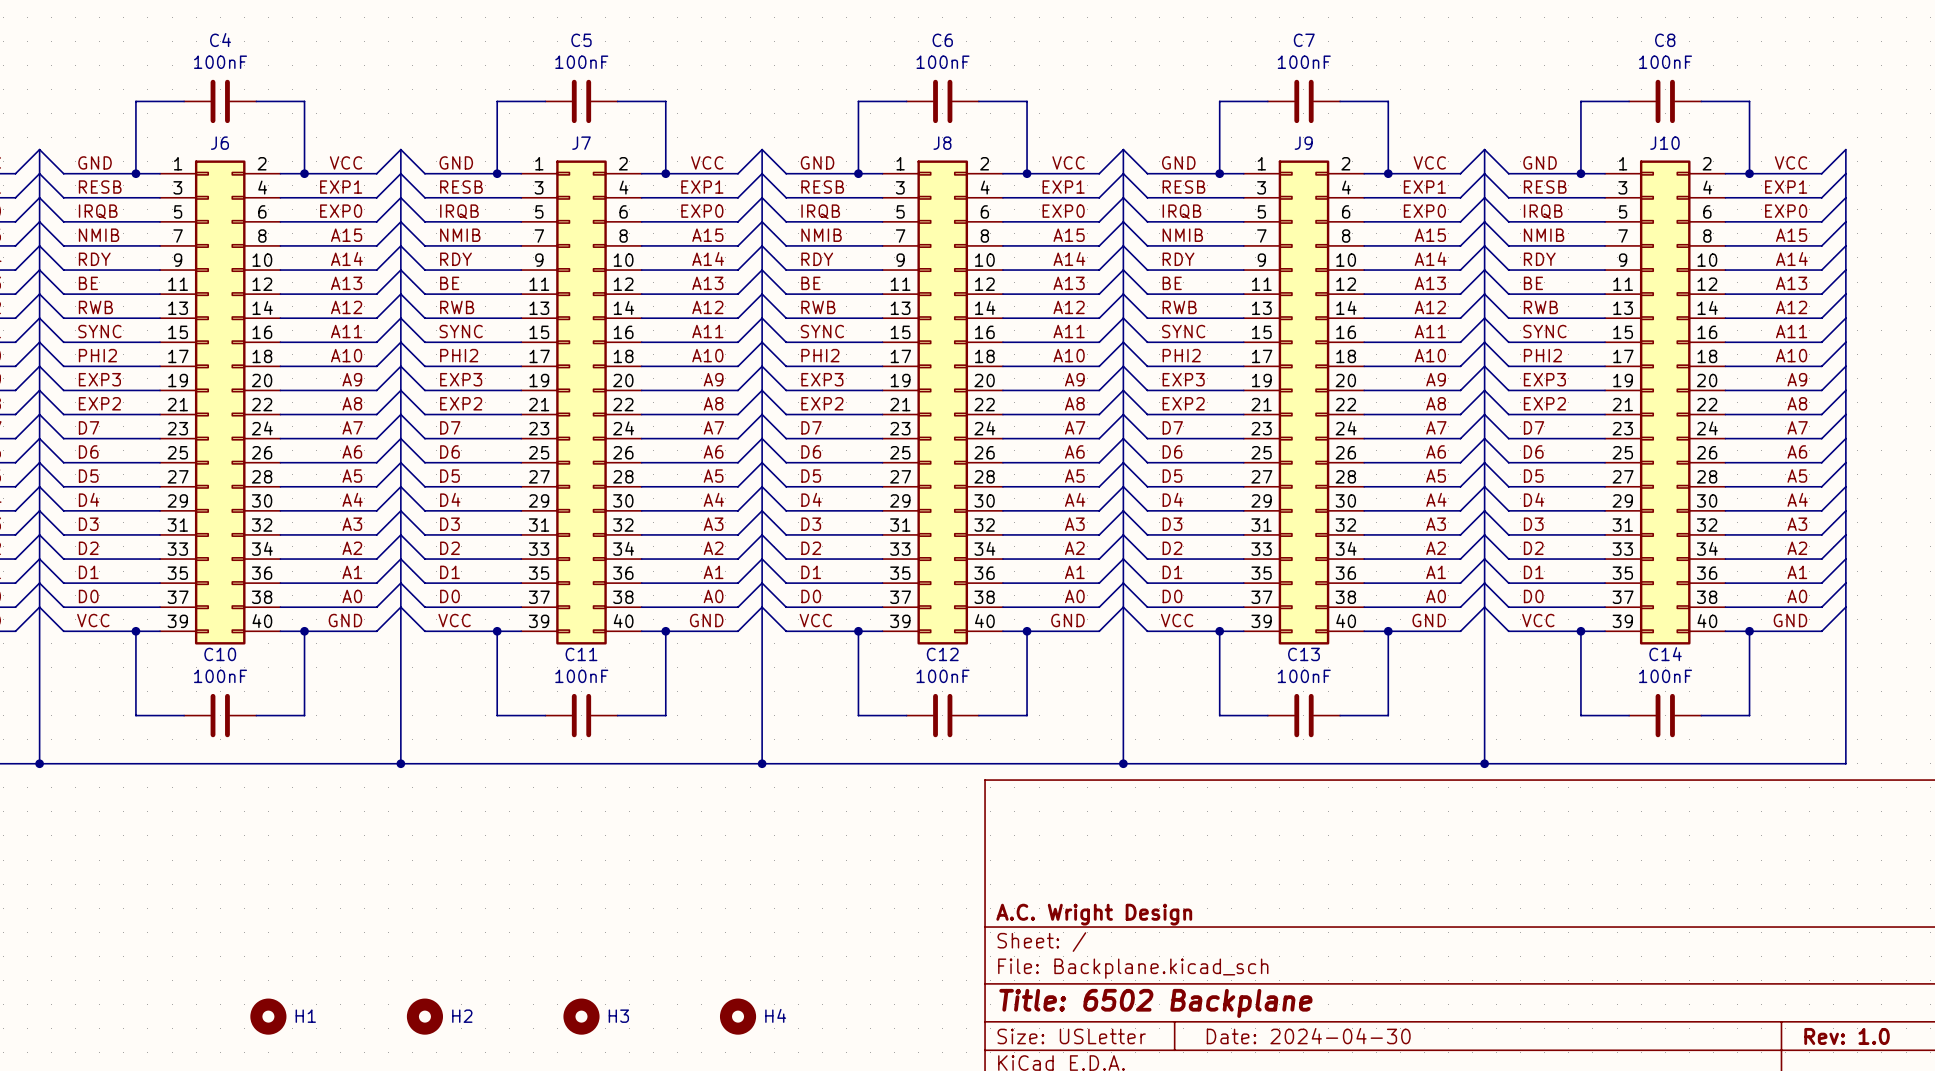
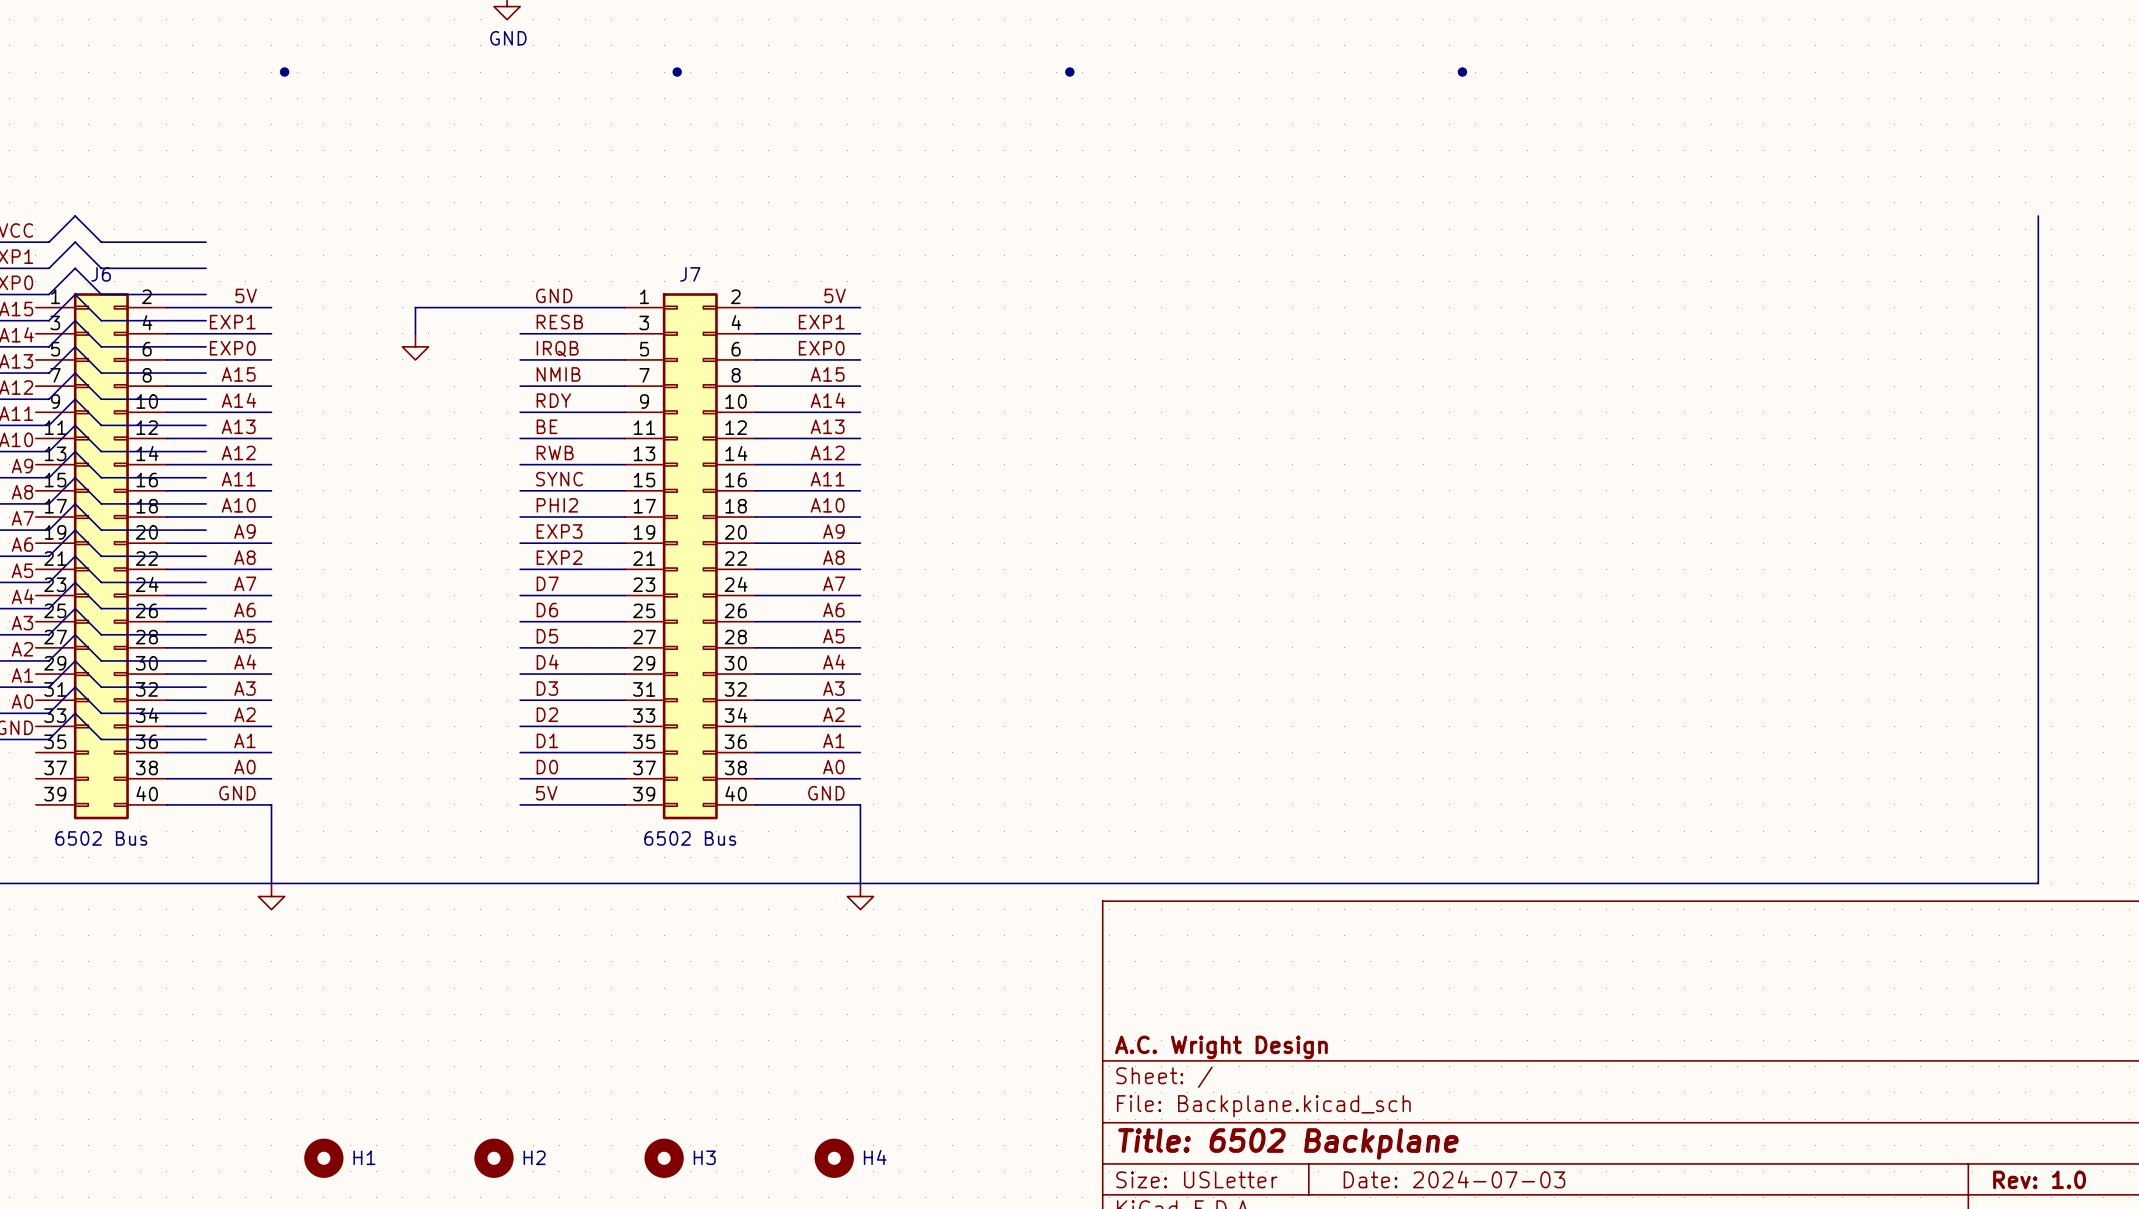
junction: none -> (284, 72)
junction: none -> (677, 72)
junction: none -> (1069, 72)
junction: none -> (1462, 72)
wire: (184, 101) (135, 101) (135, 173) -> none
C4: 100nF (220, 101) -> none
wire: (256, 101) (304, 101) (304, 173) -> none
wire: (545, 101) (497, 101) (497, 173) -> none
C5: 100nF (581, 101) -> none
wire: (617, 101) (665, 101) (665, 173) -> none
wire: (906, 101) (858, 101) (858, 173) -> none
C6: 100nF (942, 101) -> none
wire: (978, 101) (1027, 101) (1027, 173) -> none
wire: (1267, 101) (1219, 101) (1219, 173) -> none
C7: 100nF (1303, 101) -> none
wire: (1340, 101) (1388, 101) (1388, 173) -> none
wire: (1629, 101) (1580, 101) (1580, 173) -> none
C8: 100nF (1665, 101) -> none
wire: (1701, 101) (1749, 101) (1749, 173) -> none
bus: (39, 149) (39, 763) -> none
bus: (400, 149) (400, 763) -> none
bus: (762, 149) (762, 763) -> none
bus: (1123, 149) (1123, 763) -> none
bus: (1484, 149) (1484, 763) -> none
wire: (1845, 149) (1821, 173) (1725, 173) -> none
label: GND (95, 162) -> none
label: VCC (346, 162) -> none
label position: GND (456, 162) -> GND (554, 295)
label: VCC (707, 162) -> none
label: GND (817, 162) -> none
label: VCC (1068, 162) -> none
label: GND (1178, 162) -> none
label: VCC (1429, 162) -> none
label: GND (1540, 162) -> none
label: VCC (1791, 162) -> none
junction: (135, 173) -> none
wire: (280, 173) (376, 173) (400, 149) (424, 173) (521, 173) -> none
junction: (304, 173) -> none
junction: (497, 173) -> none
wire: (641, 173) (738, 173) (762, 149) (786, 173) (882, 173) -> none
junction: (665, 173) -> none
junction: (858, 173) -> none
wire: (1002, 173) (1099, 173) (1123, 149) (1147, 173) (1243, 173) -> none
junction: (1027, 173) -> none
junction: (1219, 173) -> none
wire: (1364, 173) (1460, 173) (1484, 149) (1508, 173) (1605, 173) -> none
junction: (1388, 173) -> none
junction: (1580, 173) -> none
junction: (1749, 173) -> none
wire: (1845, 173) (1821, 197) (1725, 197) -> none
label: RESB (100, 187) -> none
label position: EXP1 (341, 187) -> EXP1 (232, 322)
label position: RESB (461, 187) -> RESB (559, 322)
label position: EXP1 (702, 187) -> EXP1 (821, 322)
label: RESB (822, 187) -> none
label: EXP1 (1063, 187) -> none
label: RESB (1183, 187) -> none
label: EXP1 (1424, 187) -> none
label: RESB (1545, 187) -> none
label: EXP1 (1786, 187) -> none
wire: (280, 197) (376, 197) (400, 173) (424, 197) (521, 197) -> none
wire: (641, 197) (738, 197) (762, 173) (786, 197) (882, 197) -> none
wire: (1002, 197) (1099, 197) (1123, 173) (1147, 197) (1243, 197) -> none
wire: (1364, 197) (1460, 197) (1484, 173) (1508, 197) (1605, 197) -> none
wire: (1845, 197) (1821, 221) (1725, 221) -> none
label: IRQB (98, 211) -> none
label position: EXP0 (341, 211) -> EXP0 (232, 348)
label position: IRQB (459, 211) -> IRQB (557, 348)
label position: EXP0 (702, 211) -> EXP0 (821, 348)
label: IRQB (820, 211) -> none
label: EXP0 (1063, 211) -> none
label: IRQB (1181, 211) -> none
label: EXP0 (1424, 211) -> none
label: IRQB (1543, 211) -> none
label: EXP0 (1786, 211) -> none
wire: (280, 221) (376, 221) (400, 197) (424, 221) (521, 221) -> none
wire: (641, 221) (738, 221) (762, 197) (786, 221) (882, 221) -> none
wire: (1002, 221) (1099, 221) (1123, 197) (1147, 221) (1243, 221) -> none
wire: (1364, 221) (1460, 221) (1484, 197) (1508, 221) (1605, 221) -> none
wire: (1845, 221) (1821, 245) (1725, 245) -> none
label: none -> 5V (246, 295)
label: none -> 5V (835, 295)
wire: none -> (166, 307) (271, 307)
wire: none -> (624, 307) (415, 307) (415, 333)
wire: none -> (755, 307) (860, 307)
label: NMIB (99, 235) -> none
label position: A15 (346, 235) -> A15 (238, 374)
label position: NMIB (460, 235) -> NMIB (558, 374)
label position: A15 (707, 235) -> A15 (827, 374)
label: NMIB (821, 235) -> none
label: A15 (1069, 235) -> none
label: NMIB (1182, 235) -> none
label: A15 (1430, 235) -> none
label: NMIB (1544, 235) -> none
label: A15 (1791, 235) -> none
wire: (280, 245) (376, 245) (400, 221) (424, 245) (521, 245) -> none
wire: (641, 245) (738, 245) (762, 221) (786, 245) (882, 245) -> none
wire: (1002, 245) (1099, 245) (1123, 221) (1147, 245) (1243, 245) -> none
wire: (1364, 245) (1460, 245) (1484, 221) (1508, 245) (1605, 245) -> none
wire: (1845, 245) (1821, 270) (1725, 270) -> none
wire: none -> (166, 333) (271, 333)
wire: none -> (520, 333) (624, 333)
wire: none -> (755, 333) (860, 333)
label: RDY (94, 259) -> none
label position: A14 (346, 259) -> A14 (239, 400)
label position: RDY (456, 259) -> RDY (553, 400)
label position: A14 (708, 259) -> A14 (827, 400)
label: RDY (817, 259) -> none
label: A14 (1069, 259) -> none
label: RDY (1178, 259) -> none
label: A14 (1430, 259) -> none
label: RDY (1539, 259) -> none
label: A14 (1791, 259) -> none
wire: (280, 270) (376, 270) (400, 245) (424, 270) (521, 270) -> none
power symbol: none -> (415, 346)
wire: (641, 270) (738, 270) (762, 245) (786, 270) (882, 270) -> none
wire: (1002, 270) (1099, 270) (1123, 245) (1147, 270) (1243, 270) -> none
wire: (1364, 270) (1460, 270) (1484, 245) (1508, 270) (1605, 270) -> none
wire: (1845, 270) (1821, 294) (1725, 294) -> none
wire: none -> (166, 359) (271, 359)
wire: none -> (520, 359) (624, 359)
wire: none -> (755, 359) (860, 359)
label: BE (88, 283) -> none
label position: A13 (346, 283) -> A13 (238, 426)
label position: BE (449, 283) -> BE (547, 426)
label position: A13 (707, 283) -> A13 (827, 426)
label: BE (810, 283) -> none
label: A13 (1069, 283) -> none
label: BE (1172, 283) -> none
label: A13 (1430, 283) -> none
label: BE (1533, 283) -> none
label: A13 (1791, 283) -> none
wire: (280, 294) (376, 294) (400, 270) (424, 294) (521, 294) -> none
wire: (641, 294) (738, 294) (762, 270) (786, 294) (882, 294) -> none
wire: (1002, 294) (1099, 294) (1123, 270) (1147, 294) (1243, 294) -> none
wire: (1364, 294) (1460, 294) (1484, 270) (1508, 294) (1605, 294) -> none
wire: (1845, 294) (1821, 318) (1725, 318) -> none
wire: none -> (166, 386) (271, 386)
wire: none -> (520, 386) (624, 386)
wire: none -> (755, 386) (860, 386)
label: RWB (95, 307) -> none
label position: A12 (346, 307) -> A12 (238, 452)
label position: RWB (457, 307) -> RWB (555, 452)
label position: A12 (707, 307) -> A12 (827, 452)
label: RWB (818, 307) -> none
label: A12 (1069, 307) -> none
label: RWB (1179, 307) -> none
label: A12 (1430, 307) -> none
label: RWB (1540, 307) -> none
label: A12 (1791, 307) -> none
wire: (280, 318) (376, 318) (400, 294) (424, 318) (521, 318) -> none
wire: (641, 318) (738, 318) (762, 294) (786, 318) (882, 318) -> none
wire: (1002, 318) (1099, 318) (1123, 294) (1147, 318) (1243, 318) -> none
wire: (1364, 318) (1460, 318) (1484, 294) (1508, 318) (1605, 318) -> none
wire: (1845, 318) (1821, 342) (1725, 342) -> none
wire: none -> (166, 412) (271, 412)
wire: none -> (520, 412) (624, 412)
wire: none -> (755, 412) (860, 412)
label: SYNC (99, 331) -> none
label position: A11 (346, 331) -> A11 (238, 479)
label position: SYNC (461, 331) -> SYNC (559, 479)
label position: A11 (707, 331) -> A11 (827, 479)
label: SYNC (822, 331) -> none
label: A11 (1069, 331) -> none
label: SYNC (1183, 331) -> none
label: A11 (1430, 331) -> none
label: SYNC (1544, 331) -> none
label: A11 (1791, 331) -> none
wire: (280, 342) (376, 342) (400, 318) (424, 342) (521, 342) -> none
wire: (641, 342) (738, 342) (762, 318) (786, 342) (882, 342) -> none
wire: (1002, 342) (1099, 342) (1123, 318) (1147, 342) (1243, 342) -> none
wire: (1364, 342) (1460, 342) (1484, 318) (1508, 342) (1605, 342) -> none
wire: (1845, 342) (1821, 366) (1725, 366) -> none
wire: none -> (166, 438) (271, 438)
wire: none -> (520, 438) (624, 438)
wire: none -> (755, 438) (860, 438)
label: PHI2 (97, 355) -> none
label position: A10 (346, 355) -> A10 (238, 505)
label position: PHI2 (459, 355) -> PHI2 (557, 505)
label position: A10 (707, 355) -> A10 (827, 505)
label: PHI2 (820, 355) -> none
label: A10 (1069, 355) -> none
label: PHI2 (1181, 355) -> none
label: A10 (1430, 355) -> none
label: PHI2 (1542, 355) -> none
label: A10 (1791, 355) -> none
wire: (280, 366) (376, 366) (400, 342) (424, 366) (521, 366) -> none
wire: (641, 366) (738, 366) (762, 342) (786, 366) (882, 366) -> none
wire: (1002, 366) (1099, 366) (1123, 342) (1147, 366) (1243, 366) -> none
wire: (1364, 366) (1460, 366) (1484, 342) (1508, 366) (1605, 366) -> none
wire: (1845, 366) (1821, 390) (1725, 390) -> none
wire: none -> (166, 464) (271, 464)
wire: none -> (520, 464) (624, 464)
wire: none -> (755, 464) (860, 464)
label: EXP3 (99, 379) -> none
label position: A9 (352, 379) -> A9 (244, 531)
label position: EXP3 (461, 379) -> EXP3 (559, 531)
label position: A9 (713, 379) -> A9 (833, 531)
label: EXP3 (822, 379) -> none
label: A9 (1074, 379) -> none
label: EXP3 (1183, 379) -> none
label: A9 (1436, 379) -> none
label: EXP3 (1544, 379) -> none
label: A9 (1797, 379) -> none
wire: (280, 390) (376, 390) (400, 366) (424, 390) (521, 390) -> none
wire: (641, 390) (738, 390) (762, 366) (786, 390) (882, 390) -> none
wire: (1002, 390) (1099, 390) (1123, 366) (1147, 390) (1243, 390) -> none
wire: (1364, 390) (1460, 390) (1484, 366) (1508, 390) (1605, 390) -> none
wire: (1845, 390) (1821, 414) (1725, 414) -> none
wire: none -> (166, 490) (271, 490)
J6 position: (220, 402) -> (101, 556)
wire: none -> (520, 490) (624, 490)
J7 position: (581, 402) -> (690, 556)
wire: none -> (755, 490) (860, 490)
J8: (942, 402) -> none
J9: (1303, 402) -> none
J10: (1665, 402) -> none
label: EXP2 (99, 403) -> none
label position: A8 (352, 403) -> A8 (244, 557)
label position: EXP2 (461, 403) -> EXP2 (559, 557)
label position: A8 (713, 403) -> A8 (833, 557)
label: EXP2 (822, 403) -> none
label: A8 (1074, 403) -> none
label: EXP2 (1183, 403) -> none
label: A8 (1436, 403) -> none
label: EXP2 (1544, 403) -> none
label: A8 (1797, 403) -> none
wire: (280, 414) (376, 414) (400, 390) (424, 414) (521, 414) -> none
wire: (641, 414) (738, 414) (762, 390) (786, 414) (882, 414) -> none
wire: (1002, 414) (1099, 414) (1123, 390) (1147, 414) (1243, 414) -> none
wire: (1364, 414) (1460, 414) (1484, 390) (1508, 414) (1605, 414) -> none
wire: (1845, 414) (1821, 438) (1725, 438) -> none
wire: none -> (166, 517) (271, 517)
wire: none -> (520, 517) (624, 517)
wire: none -> (755, 517) (860, 517)
label: D7 (89, 427) -> none
label position: A7 (352, 427) -> A7 (245, 583)
label position: D7 (450, 427) -> D7 (547, 583)
label position: A7 (713, 427) -> A7 (834, 583)
label: D7 (811, 427) -> none
label: A7 (1075, 427) -> none
label: D7 (1172, 427) -> none
label: A7 (1436, 427) -> none
label: D7 (1534, 427) -> none
label: A7 (1797, 427) -> none
wire: (280, 438) (376, 438) (400, 414) (424, 438) (521, 438) -> none
wire: (641, 438) (738, 438) (762, 414) (786, 438) (882, 438) -> none
wire: (1002, 438) (1099, 438) (1123, 414) (1147, 438) (1243, 438) -> none
wire: (1364, 438) (1460, 438) (1484, 414) (1508, 438) (1605, 438) -> none
wire: (1845, 438) (1821, 462) (1725, 462) -> none
wire: none -> (166, 543) (271, 543)
wire: none -> (520, 543) (624, 543)
wire: none -> (755, 543) (860, 543)
label: D6 (88, 451) -> none
label position: A6 (352, 451) -> A6 (244, 610)
label position: D6 (449, 451) -> D6 (547, 610)
label position: A6 (713, 451) -> A6 (833, 610)
label: D6 (811, 451) -> none
label: A6 (1074, 451) -> none
label: D6 (1172, 451) -> none
label: A6 (1436, 451) -> none
label: D6 (1533, 451) -> none
label: A6 (1797, 451) -> none
wire: (280, 462) (376, 462) (400, 438) (424, 462) (521, 462) -> none
wire: (641, 462) (738, 462) (762, 438) (786, 462) (882, 462) -> none
wire: (1002, 462) (1099, 462) (1123, 438) (1147, 462) (1243, 462) -> none
wire: (1364, 462) (1460, 462) (1484, 438) (1508, 462) (1605, 462) -> none
wire: (1845, 462) (1821, 486) (1725, 486) -> none
wire: none -> (166, 569) (271, 569)
wire: none -> (520, 569) (624, 569)
wire: none -> (755, 569) (860, 569)
label: D5 (88, 476) -> none
label position: A5 (352, 476) -> A5 (244, 636)
label position: D5 (449, 476) -> D5 (547, 636)
label position: A5 (713, 476) -> A5 (833, 636)
label: D5 (811, 476) -> none
label: A5 (1074, 476) -> none
label: D5 (1172, 476) -> none
label: A5 (1436, 476) -> none
label: D5 (1533, 476) -> none
label: A5 (1797, 476) -> none
wire: (280, 486) (376, 486) (400, 462) (424, 486) (521, 486) -> none
wire: (641, 486) (738, 486) (762, 462) (786, 486) (882, 486) -> none
wire: (1002, 486) (1099, 486) (1123, 462) (1147, 486) (1243, 486) -> none
wire: (1364, 486) (1460, 486) (1484, 462) (1508, 486) (1605, 486) -> none
wire: (1845, 486) (1821, 510) (1725, 510) -> none
wire: none -> (166, 595) (271, 595)
wire: none -> (520, 595) (624, 595)
wire: none -> (755, 595) (860, 595)
label: D4 (89, 499) -> none
label position: A4 (352, 499) -> A4 (245, 662)
label position: D4 (450, 499) -> D4 (547, 662)
label position: A4 (713, 499) -> A4 (834, 662)
label: D4 (811, 499) -> none
label: A4 (1075, 499) -> none
label: D4 (1172, 499) -> none
label: A4 (1436, 499) -> none
label: D4 (1534, 499) -> none
label: A4 (1797, 499) -> none
wire: (280, 510) (376, 510) (400, 486) (424, 510) (521, 510) -> none
wire: (641, 510) (738, 510) (762, 486) (786, 510) (882, 510) -> none
wire: (1002, 510) (1099, 510) (1123, 486) (1147, 510) (1243, 510) -> none
wire: (1364, 510) (1460, 510) (1484, 486) (1508, 510) (1605, 510) -> none
wire: (1845, 510) (1821, 534) (1725, 534) -> none
wire: none -> (166, 621) (271, 621)
wire: none -> (520, 621) (624, 621)
wire: none -> (755, 621) (860, 621)
label: D3 (88, 524) -> none
label position: A3 (352, 524) -> A3 (244, 688)
label position: D3 (449, 524) -> D3 (547, 688)
label position: A3 (713, 524) -> A3 (833, 688)
label: D3 (811, 524) -> none
label: A3 (1074, 524) -> none
label: D3 (1172, 524) -> none
label: A3 (1436, 524) -> none
label: D3 (1533, 524) -> none
label: A3 (1797, 524) -> none
wire: (280, 534) (376, 534) (400, 510) (424, 534) (521, 534) -> none
wire: (641, 534) (738, 534) (762, 510) (786, 534) (882, 534) -> none
wire: (1002, 534) (1099, 534) (1123, 510) (1147, 534) (1243, 534) -> none
wire: (1364, 534) (1460, 534) (1484, 510) (1508, 534) (1605, 534) -> none
wire: (1845, 534) (1821, 559) (1725, 559) -> none
wire: none -> (166, 647) (271, 647)
wire: none -> (520, 647) (624, 647)
wire: none -> (755, 647) (860, 647)
label: D2 (88, 548) -> none
label position: A2 (352, 548) -> A2 (244, 714)
label position: D2 (449, 548) -> D2 (547, 714)
label position: A2 (713, 548) -> A2 (833, 714)
label: D2 (811, 548) -> none
label: A2 (1074, 548) -> none
label: D2 (1172, 548) -> none
label: A2 (1436, 548) -> none
label: D2 (1533, 548) -> none
label: A2 (1797, 548) -> none
wire: (280, 559) (376, 559) (400, 534) (424, 559) (521, 559) -> none
wire: (641, 559) (738, 559) (762, 534) (786, 559) (882, 559) -> none
wire: (1002, 559) (1099, 559) (1123, 534) (1147, 559) (1243, 559) -> none
wire: (1364, 559) (1460, 559) (1484, 534) (1508, 559) (1605, 559) -> none
wire: (1845, 559) (1821, 583) (1725, 583) -> none
wire: none -> (166, 674) (271, 674)
wire: none -> (520, 674) (624, 674)
wire: none -> (755, 674) (860, 674)
label: D1 (88, 572) -> none
label position: A1 (352, 572) -> A1 (244, 740)
label position: D1 (449, 572) -> D1 (547, 740)
label position: A1 (713, 572) -> A1 (833, 740)
label: D1 (811, 572) -> none
label: A1 (1074, 572) -> none
label: D1 (1172, 572) -> none
label: A1 (1436, 572) -> none
label: D1 (1533, 572) -> none
label: A1 (1797, 572) -> none
wire: (280, 583) (376, 583) (400, 559) (424, 583) (521, 583) -> none
wire: (641, 583) (738, 583) (762, 559) (786, 583) (882, 583) -> none
wire: (1002, 583) (1099, 583) (1123, 559) (1147, 583) (1243, 583) -> none
wire: (1364, 583) (1460, 583) (1484, 559) (1508, 583) (1605, 583) -> none
wire: (1845, 583) (1821, 607) (1725, 607) -> none
wire: none -> (166, 700) (271, 700)
wire: none -> (520, 700) (624, 700)
wire: none -> (755, 700) (860, 700)
label: D0 (88, 596) -> none
label position: A0 (352, 596) -> A0 (244, 767)
label position: D0 (449, 596) -> D0 (547, 767)
label position: A0 (713, 596) -> A0 (833, 767)
label: D0 (811, 596) -> none
label: A0 (1074, 596) -> none
label: D0 (1172, 596) -> none
label: A0 (1436, 596) -> none
label: D0 (1533, 596) -> none
label: A0 (1797, 596) -> none
wire: (280, 607) (376, 607) (400, 583) (424, 607) (521, 607) -> none
wire: (641, 607) (738, 607) (762, 583) (786, 607) (882, 607) -> none
wire: (1002, 607) (1099, 607) (1123, 583) (1147, 607) (1243, 607) -> none
wire: (1364, 607) (1460, 607) (1484, 583) (1508, 607) (1605, 607) -> none
wire: (1845, 607) (1821, 631) (1725, 631) -> none
wire: none -> (166, 726) (271, 726)
wire: none -> (520, 726) (624, 726)
wire: none -> (755, 726) (860, 726)
label: VCC (93, 620) -> none
label position: GND (345, 620) -> GND (237, 793)
label: VCC (454, 620) -> none
label position: GND (706, 620) -> GND (826, 793)
label: VCC (815, 620) -> none
label: GND (1067, 620) -> none
label: VCC (1177, 620) -> none
label: GND (1429, 620) -> none
label: VCC (1538, 620) -> none
label: GND (1790, 620) -> none
wire: (135, 631) (135, 715) (184, 715) -> none
junction: (135, 631) -> none
wire: (280, 631) (376, 631) (400, 607) (424, 631) (521, 631) -> none
wire: (304, 631) (304, 715) (256, 715) -> none
junction: (304, 631) -> none
wire: (497, 631) (497, 715) (545, 715) -> none
junction: (497, 631) -> none
wire: (641, 631) (738, 631) (762, 607) (786, 631) (882, 631) -> none
wire: (665, 631) (665, 715) (617, 715) -> none
junction: (665, 631) -> none
wire: (858, 631) (858, 715) (906, 715) -> none
junction: (858, 631) -> none
wire: (1002, 631) (1099, 631) (1123, 607) (1147, 631) (1243, 631) -> none
wire: (1027, 631) (1027, 715) (978, 715) -> none
junction: (1027, 631) -> none
wire: (1219, 631) (1219, 715) (1267, 715) -> none
junction: (1219, 631) -> none
wire: (1364, 631) (1460, 631) (1484, 607) (1508, 631) (1605, 631) -> none
wire: (1388, 631) (1388, 715) (1340, 715) -> none
junction: (1388, 631) -> none
wire: (1580, 631) (1580, 715) (1629, 715) -> none
junction: (1580, 631) -> none
wire: (1749, 631) (1749, 715) (1701, 715) -> none
junction: (1749, 631) -> none
wire: none -> (166, 752) (271, 752)
wire: none -> (520, 752) (624, 752)
wire: none -> (755, 752) (860, 752)
wire: none -> (166, 778) (271, 778)
wire: none -> (520, 778) (624, 778)
wire: none -> (755, 778) (860, 778)
label: none -> 5V (546, 793)
wire: none -> (166, 804) (271, 804) (271, 883)
wire: none -> (520, 804) (624, 804)
wire: none -> (755, 804) (860, 804) (860, 883)
C10: 100nF (220, 715) -> none
C11: 100nF (581, 715) -> none
C12: 100nF (942, 715) -> none
C13: 100nF (1303, 715) -> none
C14: 100nF (1665, 715) -> none
J6 value: none -> 6502 Bus (101, 838)
J7 value: none -> 6502 Bus (690, 838)
junction: (39, 763) -> none
junction: (400, 763) -> none
junction: (762, 763) -> none
junction: (1123, 763) -> none
junction: (1484, 763) -> none
power symbol: none -> (271, 896)
power symbol: none -> (860, 896)
title block: Date: 2024-04-30 (1308, 1036) -> Date: 2024-07-03 (1454, 1179)

